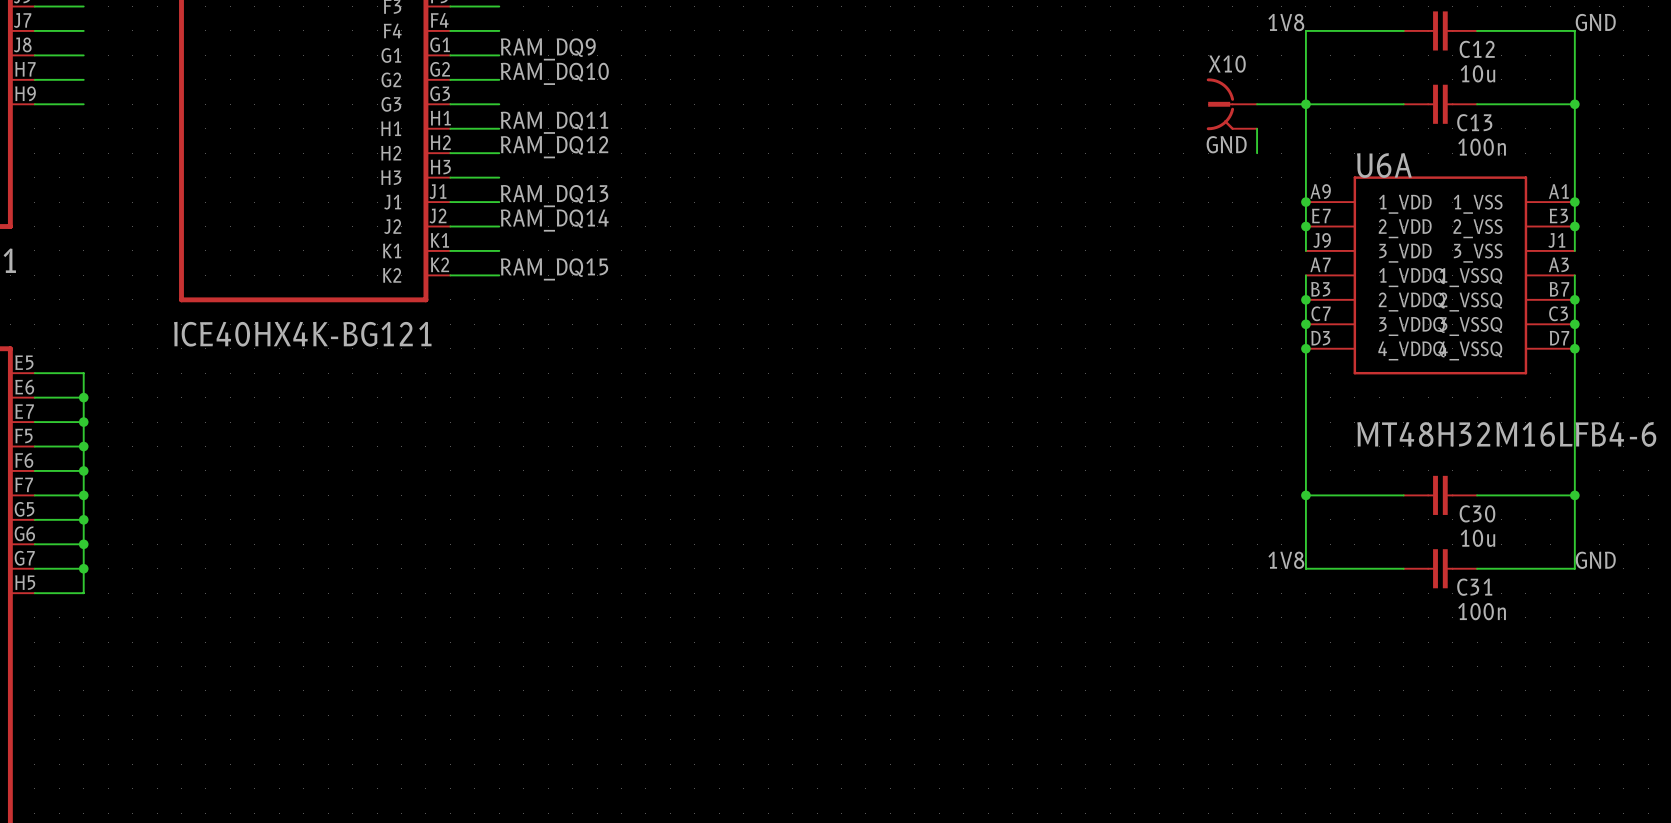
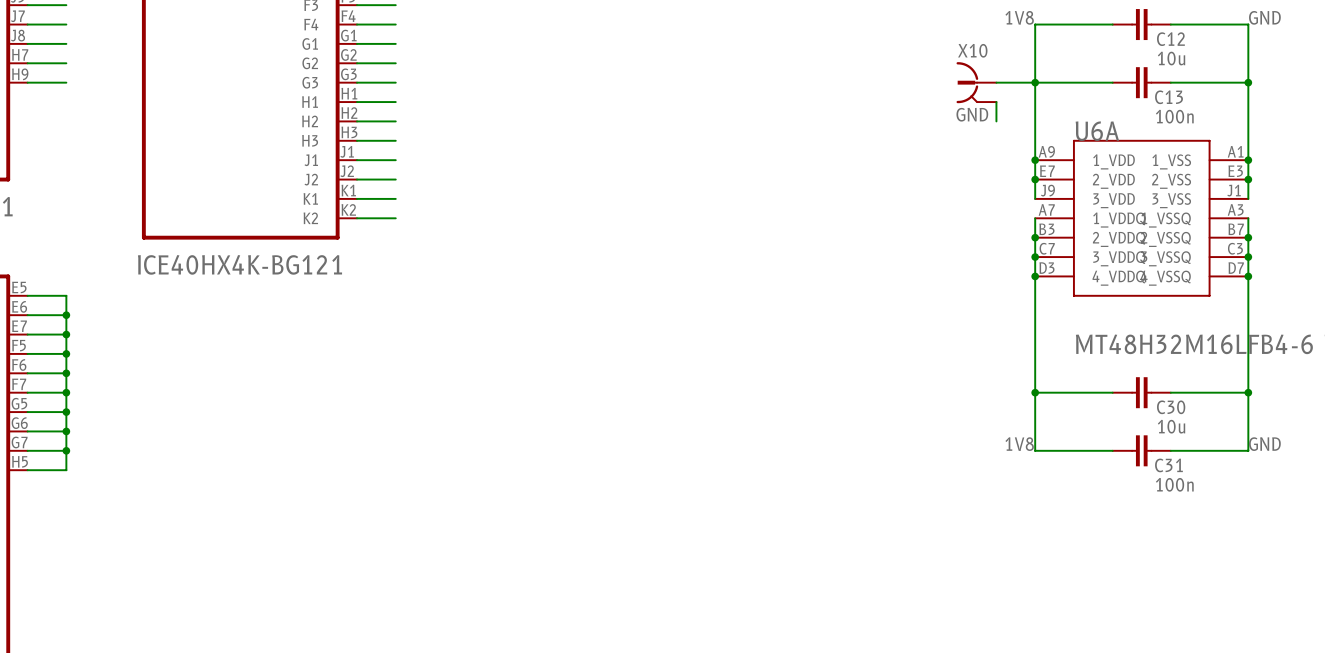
label: RAM_DQ9 (548, 49) -> none
label: RAM_DQ10 (554, 73) -> none
label: RAM_DQ11 (554, 122) -> none
label: RAM_DQ12 (554, 147) -> none
label: RAM_DQ13 (554, 196) -> none
label: RAM_DQ14 (554, 220) -> none
label: RAM_DQ15 (554, 269) -> none

